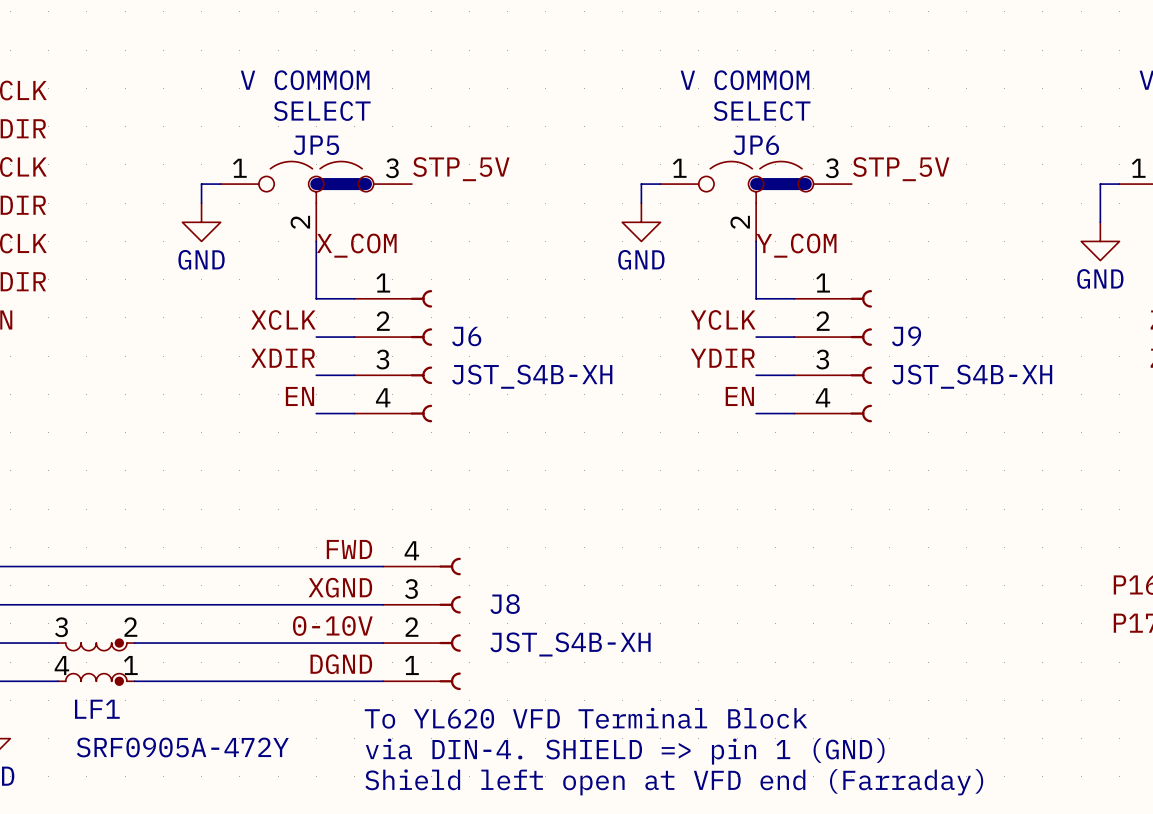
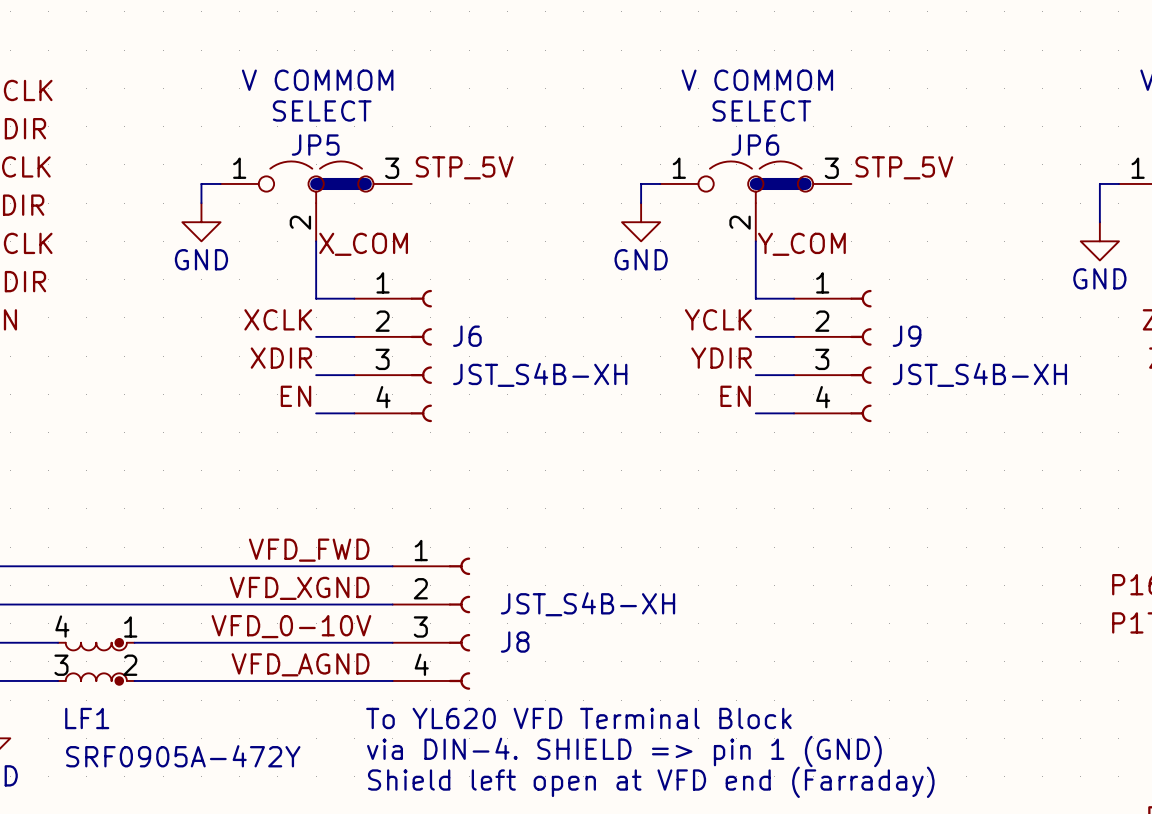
label: FWD (349, 549) -> VFD_FWD (309, 550)
label: XGND (340, 587) -> VFD_XGND (299, 588)
J8 flip: as is (450, 623) -> up-down (459, 623)
label: 0-10V (332, 625) -> VFD_0-10V (291, 626)
LF1 flip: as is (96, 662) -> up-down (96, 661)
label: DGND (341, 664) -> VFD_AGND (300, 664)

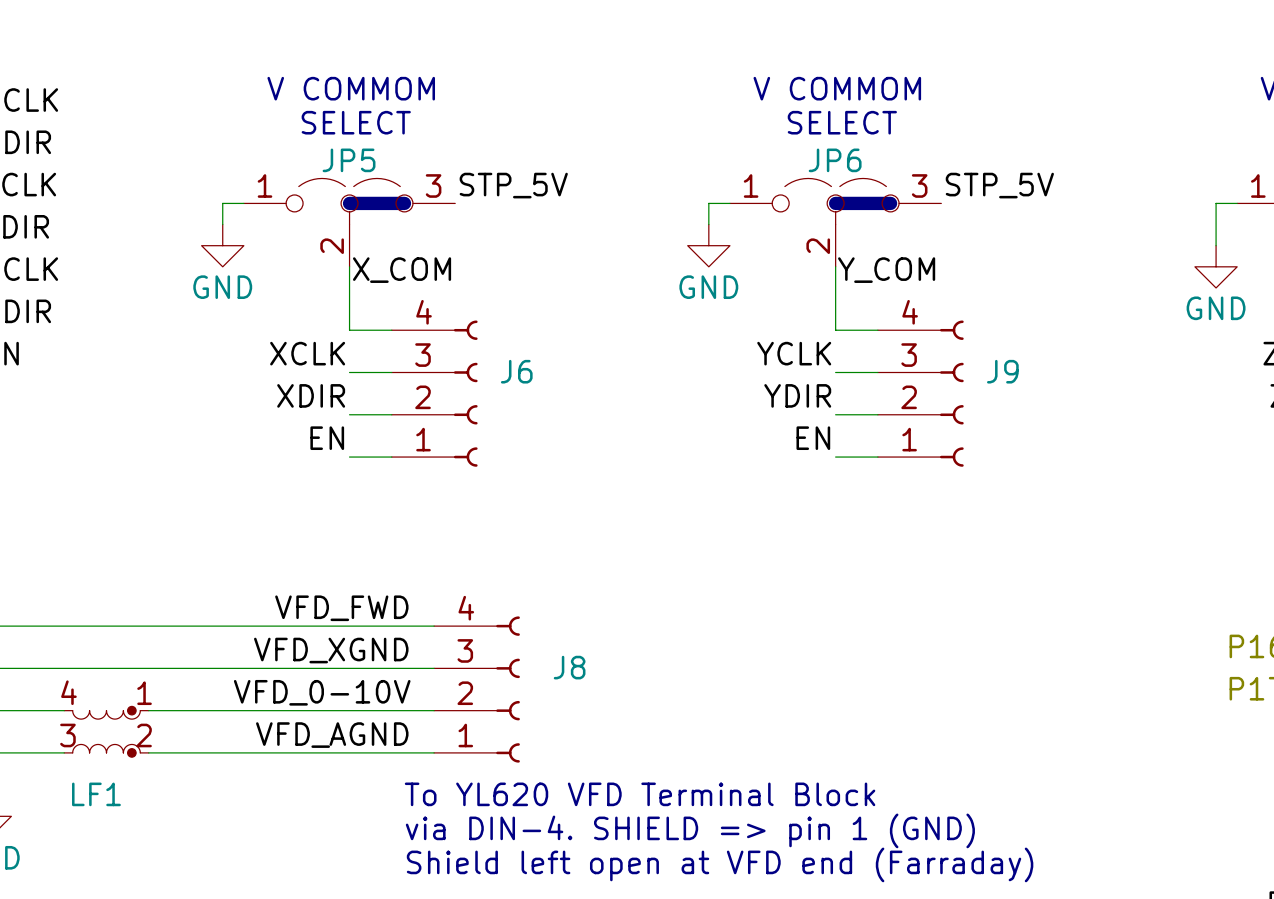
J6 flip: as is (421, 356) -> up-down (465, 393)
J9 flip: as is (860, 356) -> up-down (951, 393)
J6 value: JST_S4B-XH (540, 374) -> none
J9 value: JST_S4B-XH (979, 374) -> none
J8 value: JST_S4B-XH (588, 604) -> none
J8 flip: as is (459, 623) -> up-down (508, 689)
LF1 value: SRF0905A-472Y (183, 756) -> none

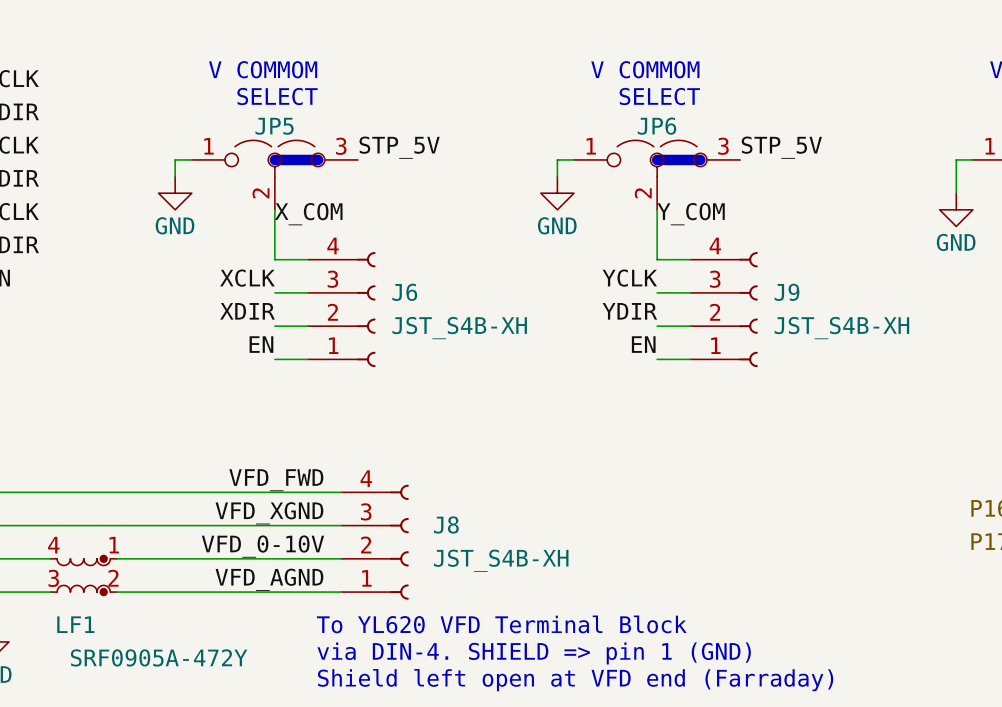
J6 value: none -> JST_S4B-XH (459, 328)
J9 value: none -> JST_S4B-XH (841, 328)
J8 value: none -> JST_S4B-XH (501, 560)
LF1 value: none -> SRF0905A-472Y (159, 657)

